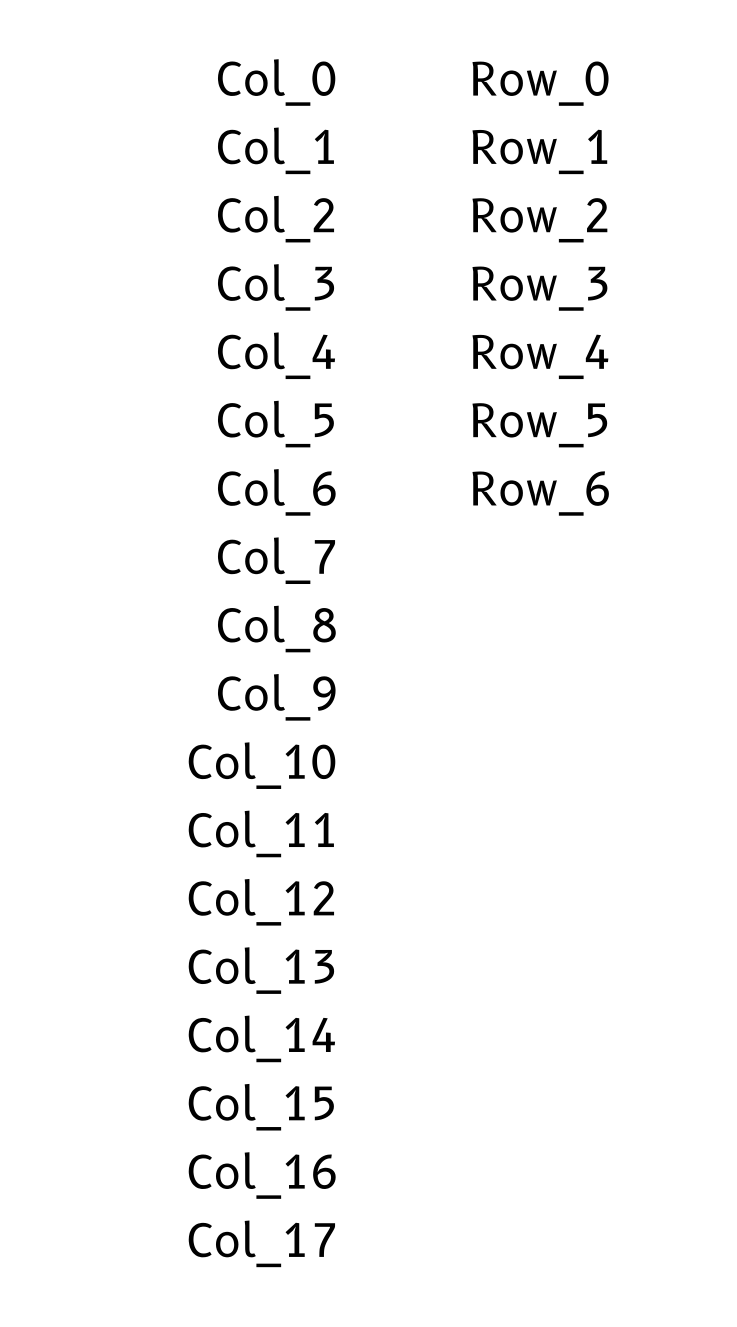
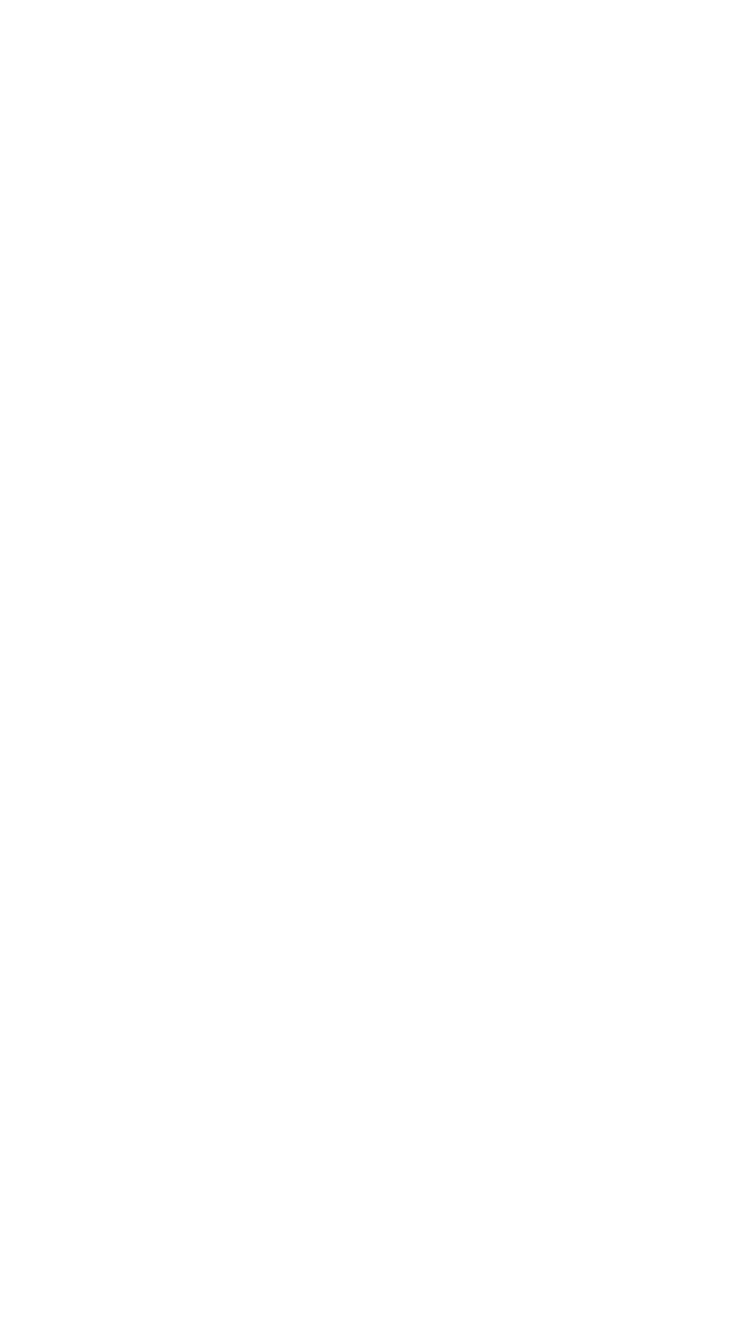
label: Col_0 (276, 82) -> none
label: Row_0 (540, 83) -> none
label: Col_1 (275, 150) -> none
label: Row_1 (539, 151) -> none
label: Col_2 (276, 219) -> none
label: Row_2 (539, 220) -> none
label: Col_3 (276, 287) -> none
label: Row_3 (539, 288) -> none
label: Col_4 (276, 355) -> none
label: Row_4 (540, 356) -> none
label: Col_5 (275, 424) -> none
label: Row_5 (539, 425) -> none
label: Col_6 (276, 492) -> none
label: Row_6 (540, 493) -> none
label: Col_7 (276, 560) -> none
label: Col_8 (276, 629) -> none
label: Col_9 (276, 697) -> none
label: Col_10 (262, 765) -> none
label: Col_11 (261, 833) -> none
label: Col_12 (261, 902) -> none
label: Col_13 (261, 970) -> none
label: Col_14 (261, 1038) -> none
label: Col_15 (261, 1107) -> none
label: Col_16 (262, 1175) -> none
label: Col_17 (261, 1243) -> none

